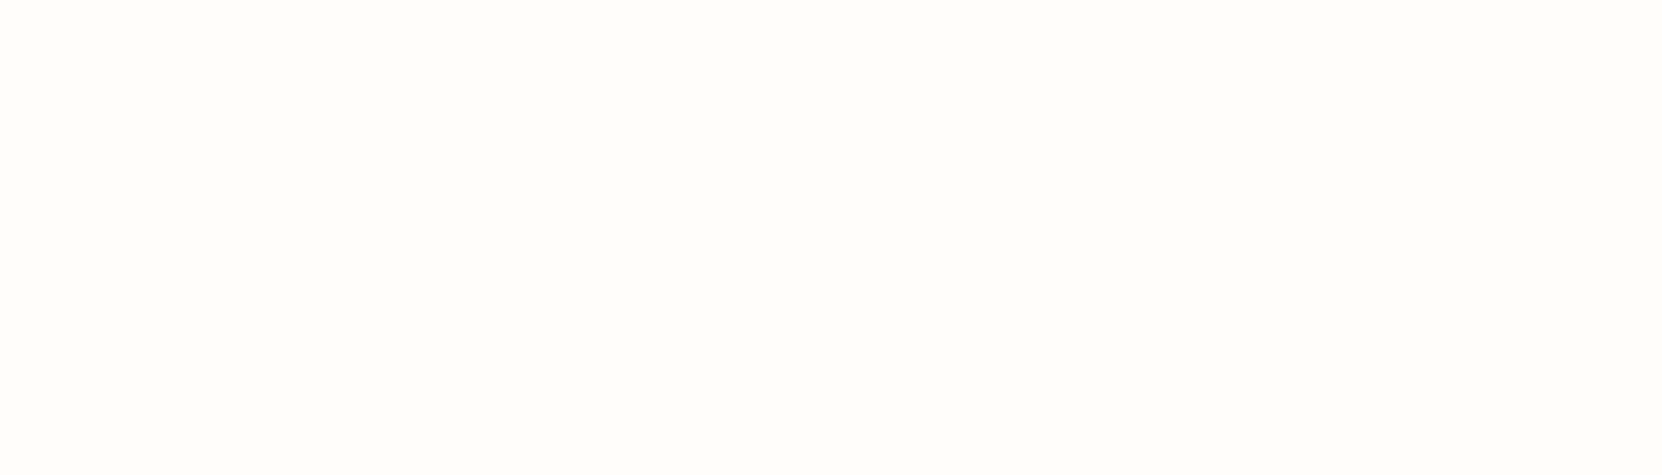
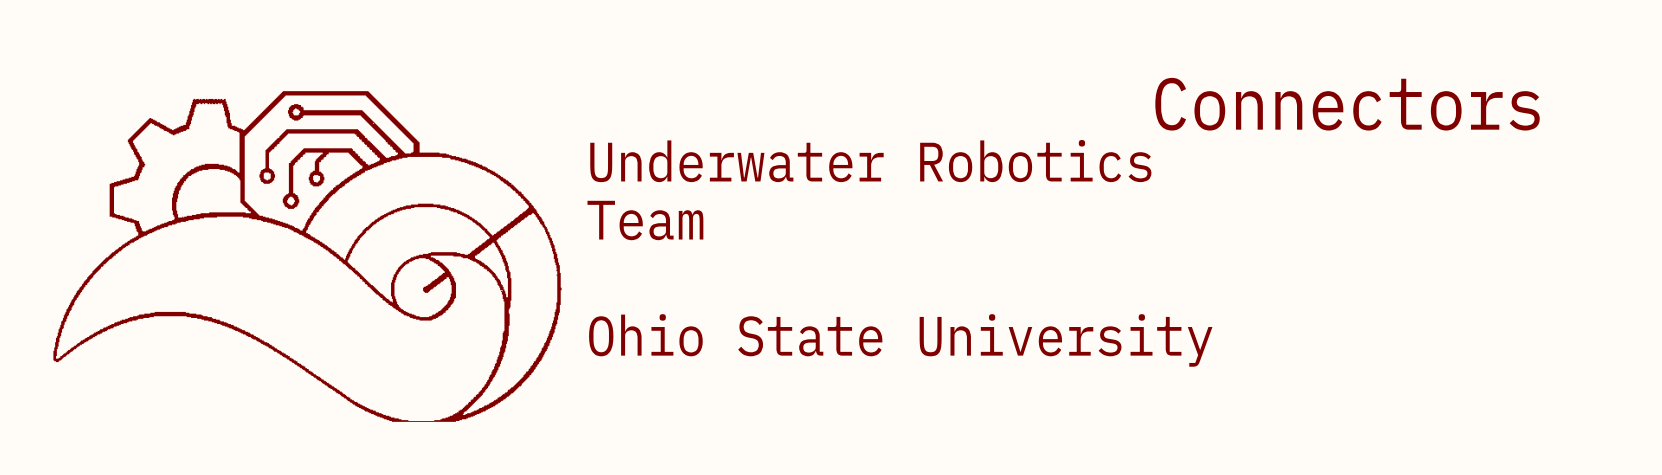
drawing: none -> [53, 91, 562, 422]
text: none -> Connectors (1347, 104)
text: none -> Underwater Robotics (870, 161)
text: none -> Team (645, 220)
text: none -> Ohio State University (900, 340)

